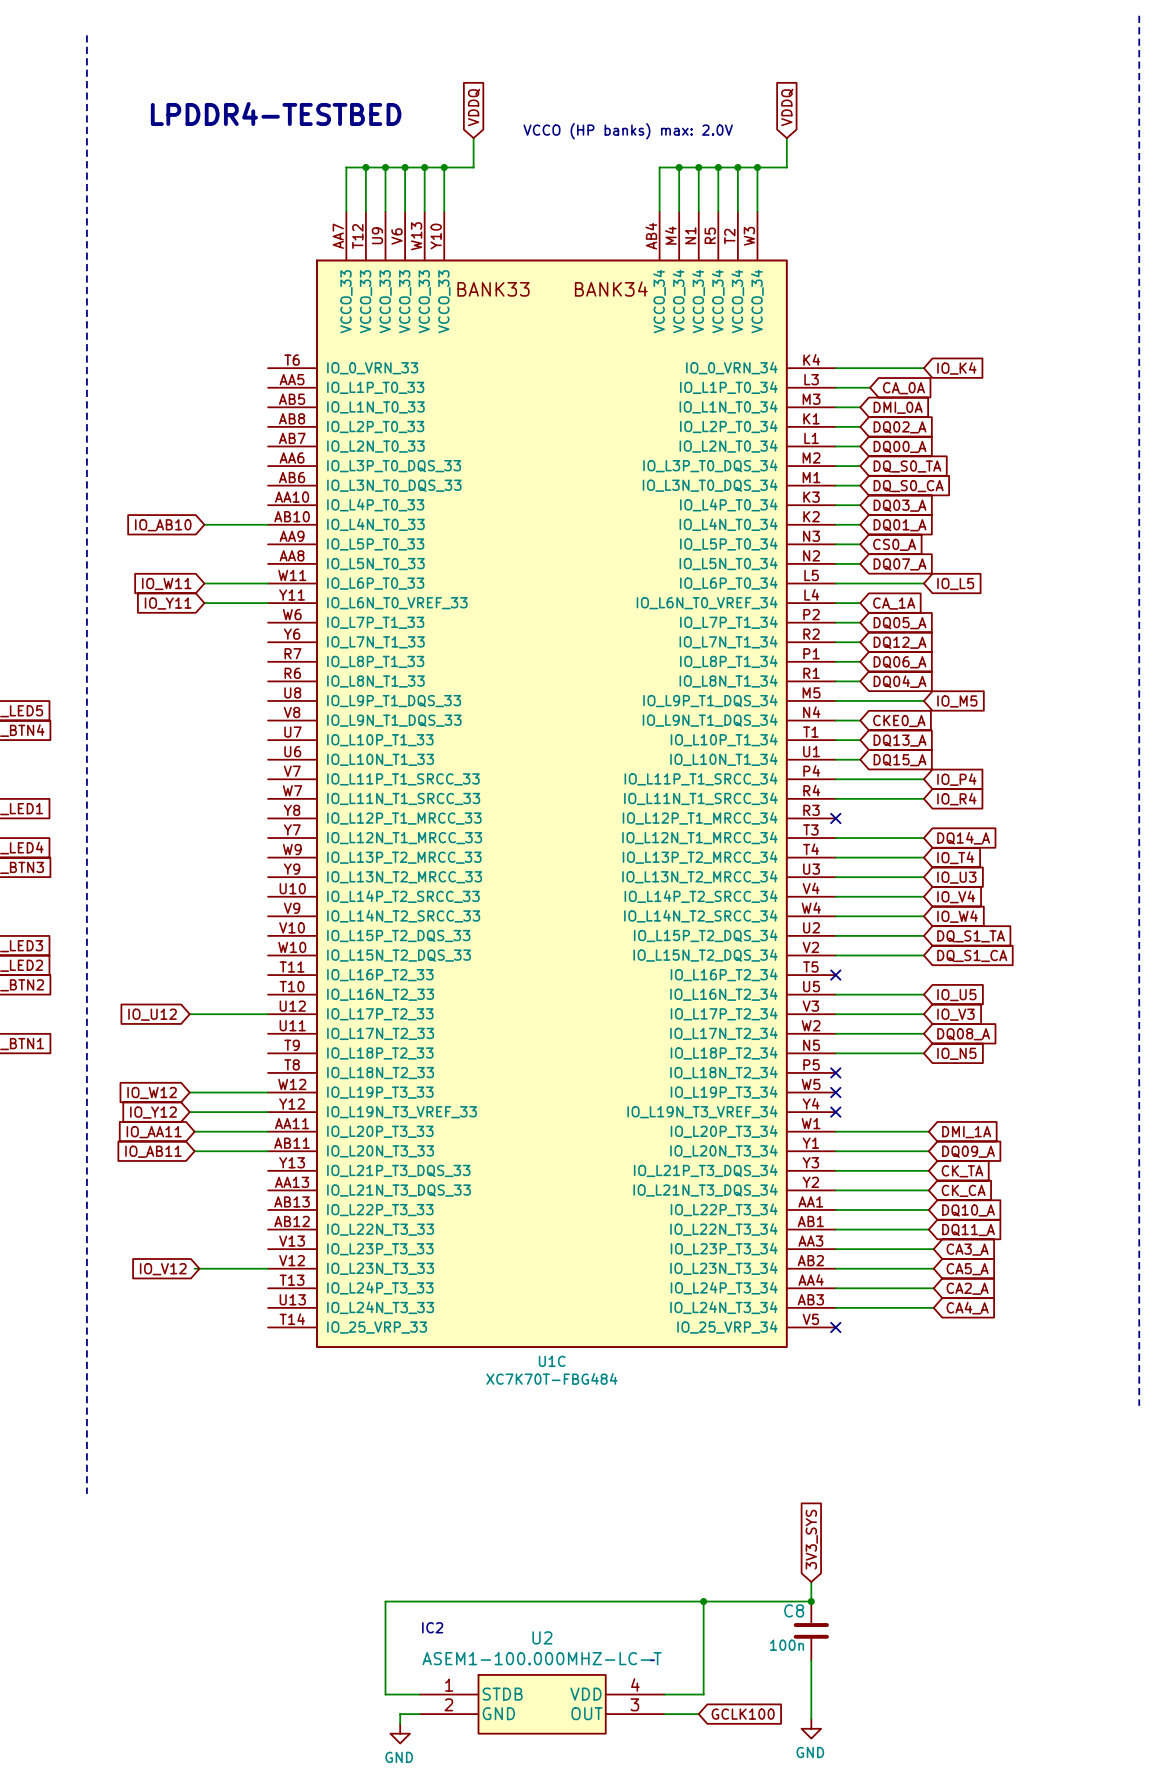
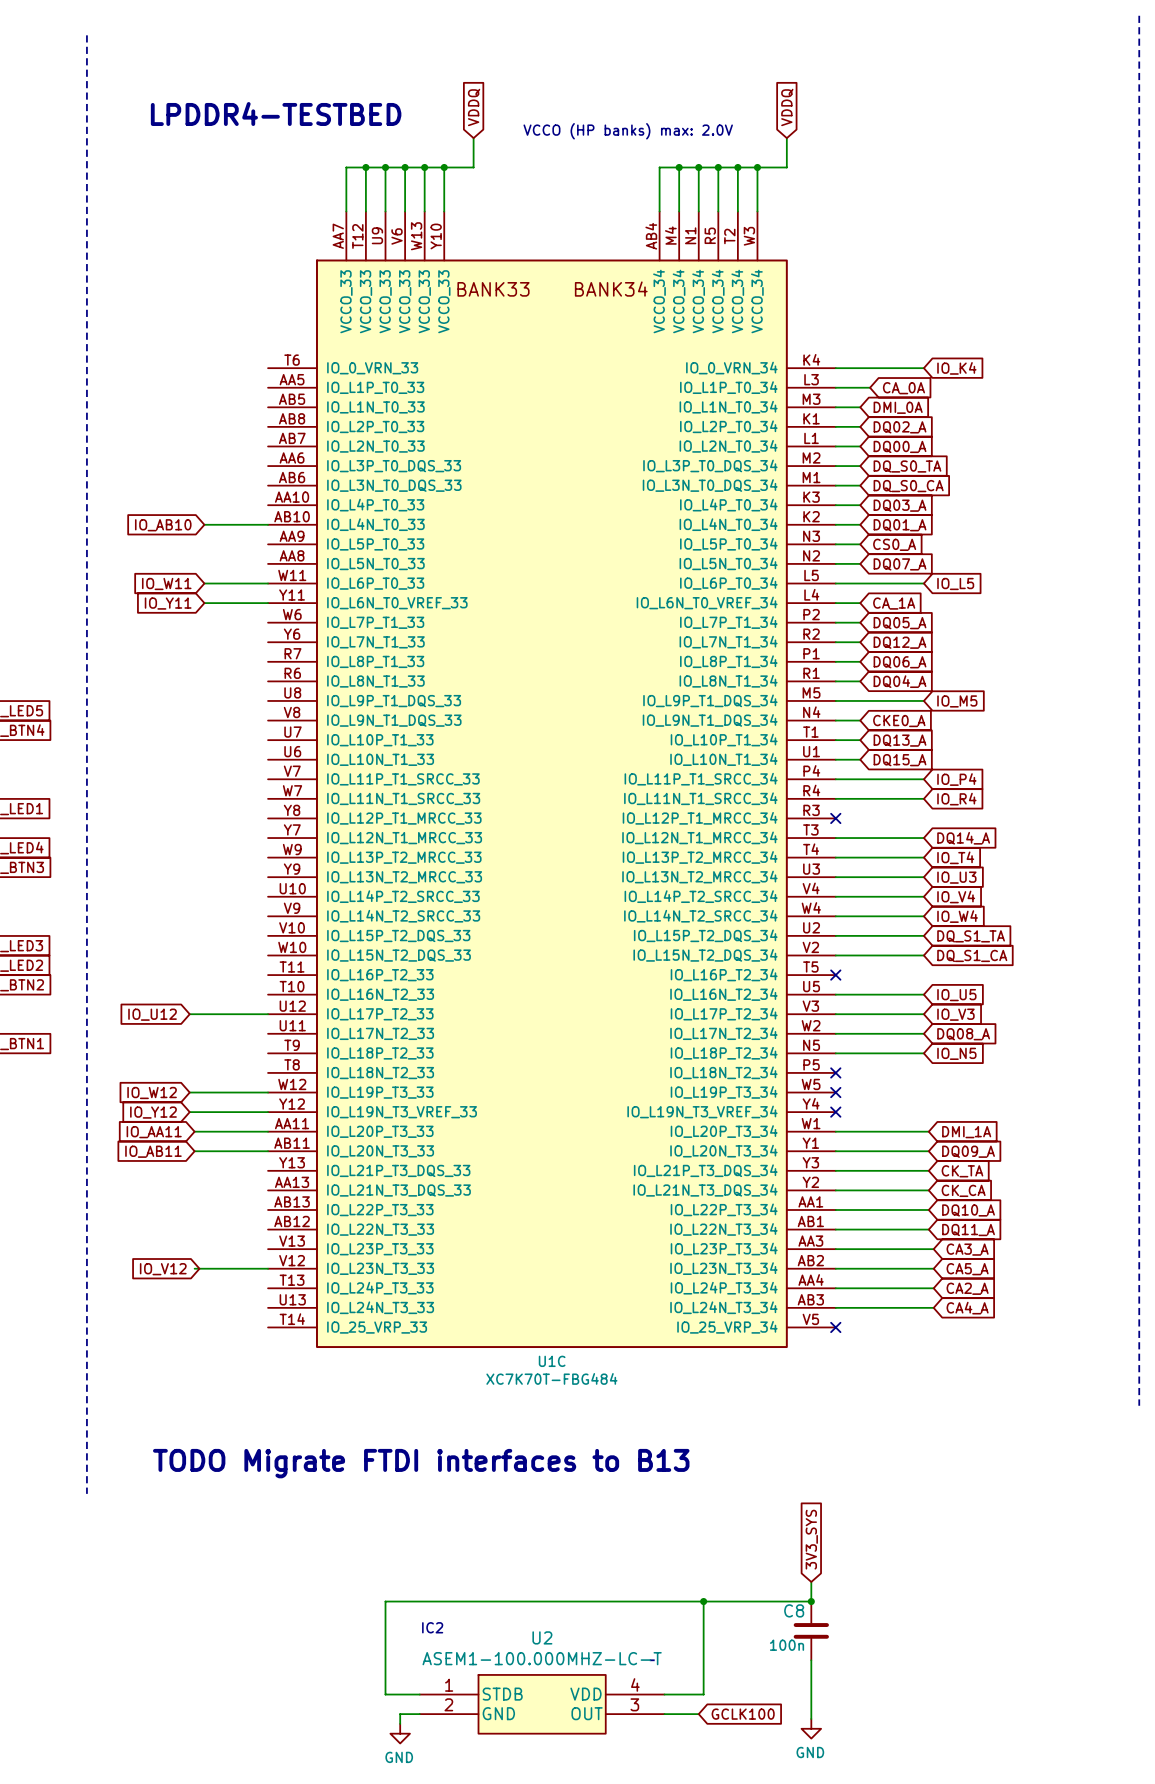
text: none -> TODO Migrate FTDI interfaces to B13 (421, 1463)

